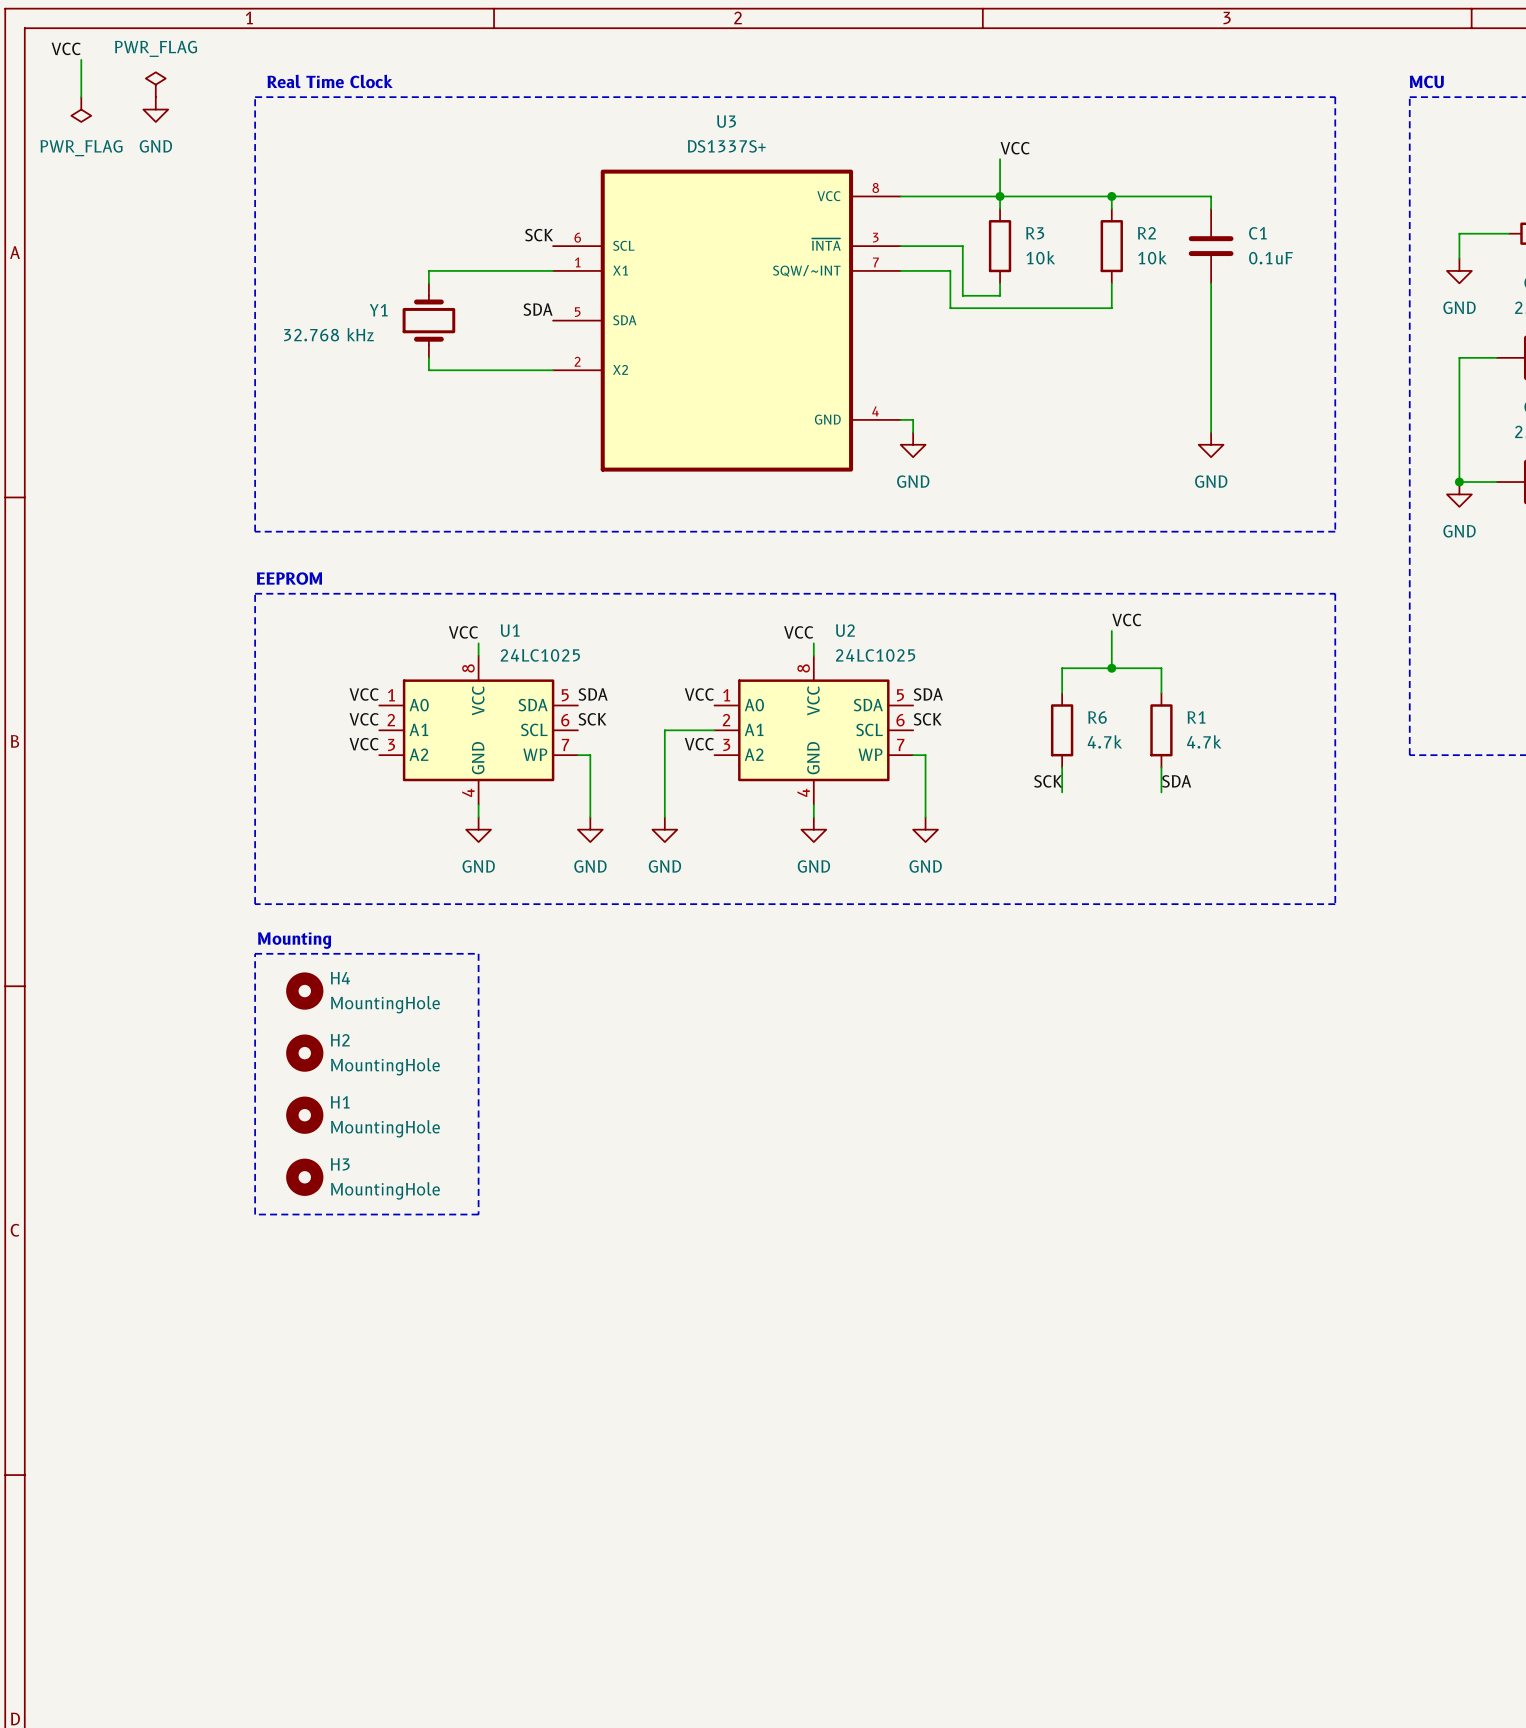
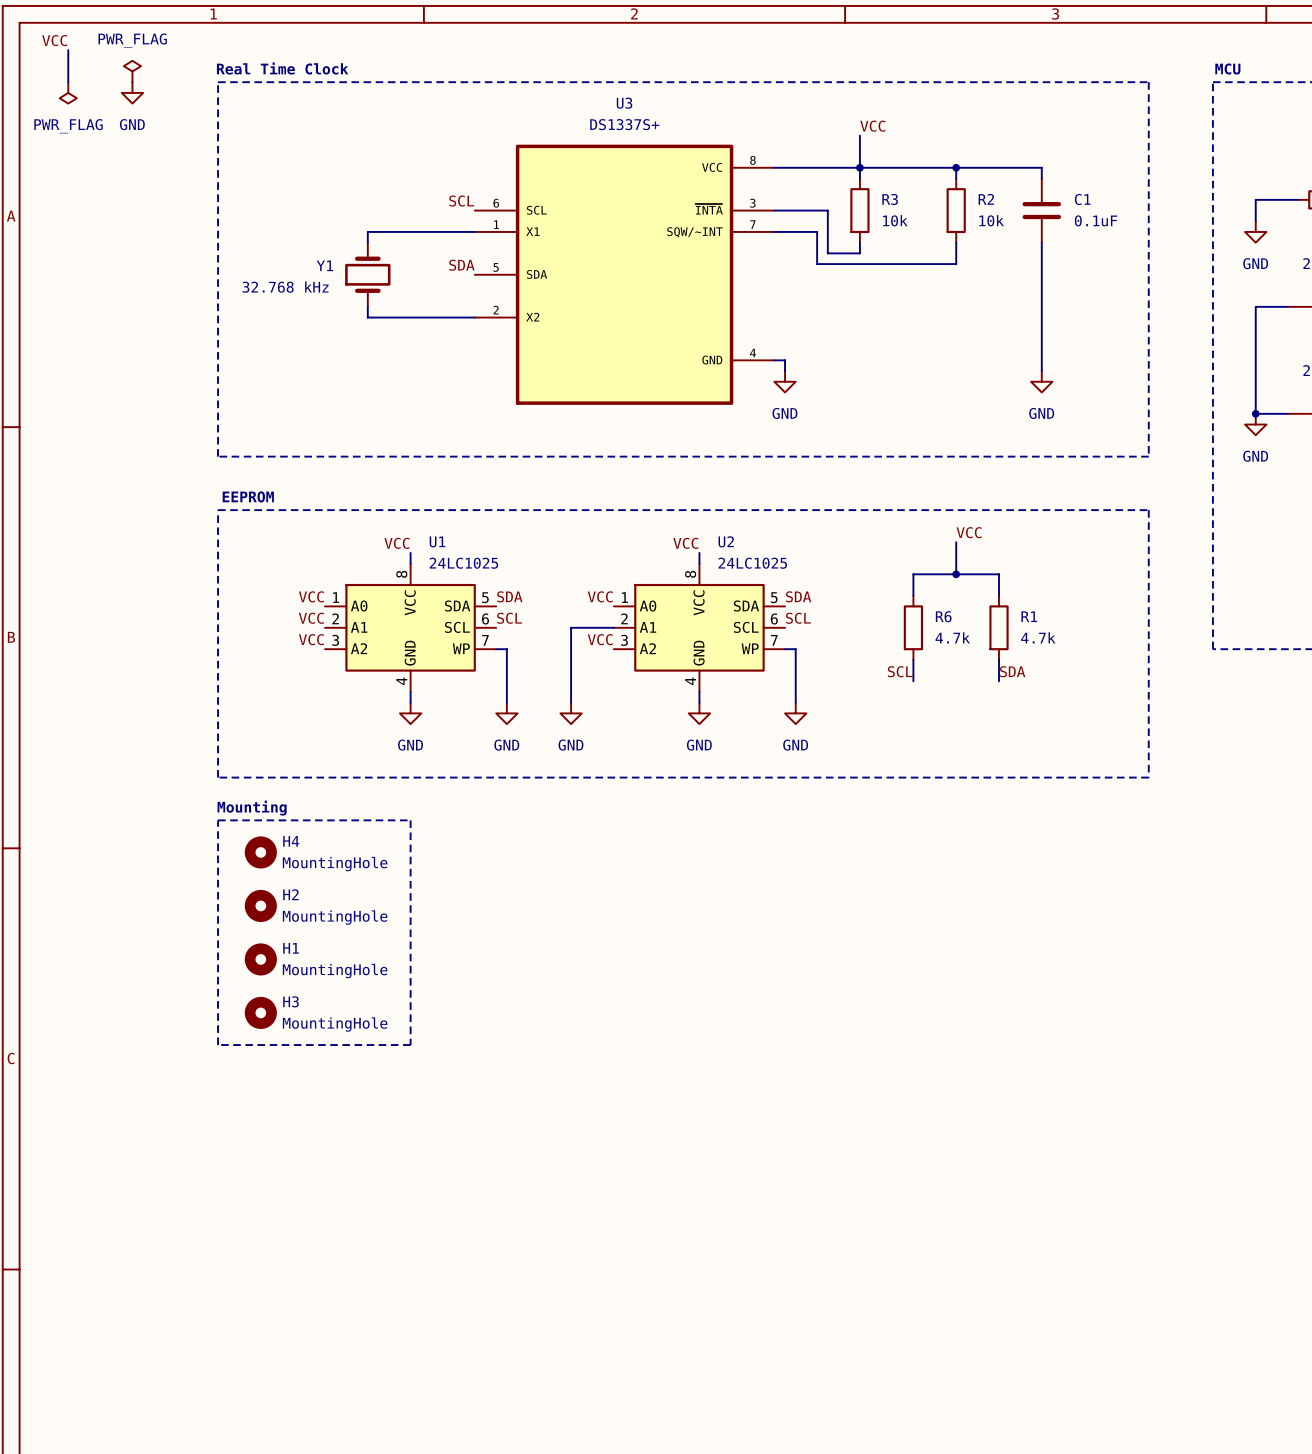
label: SCK (539, 235) -> SCL (461, 201)
label: SCK (592, 719) -> SCL (509, 618)
label: SCK (927, 719) -> SCL (798, 618)
label: SCK (1048, 781) -> SCL (900, 671)

